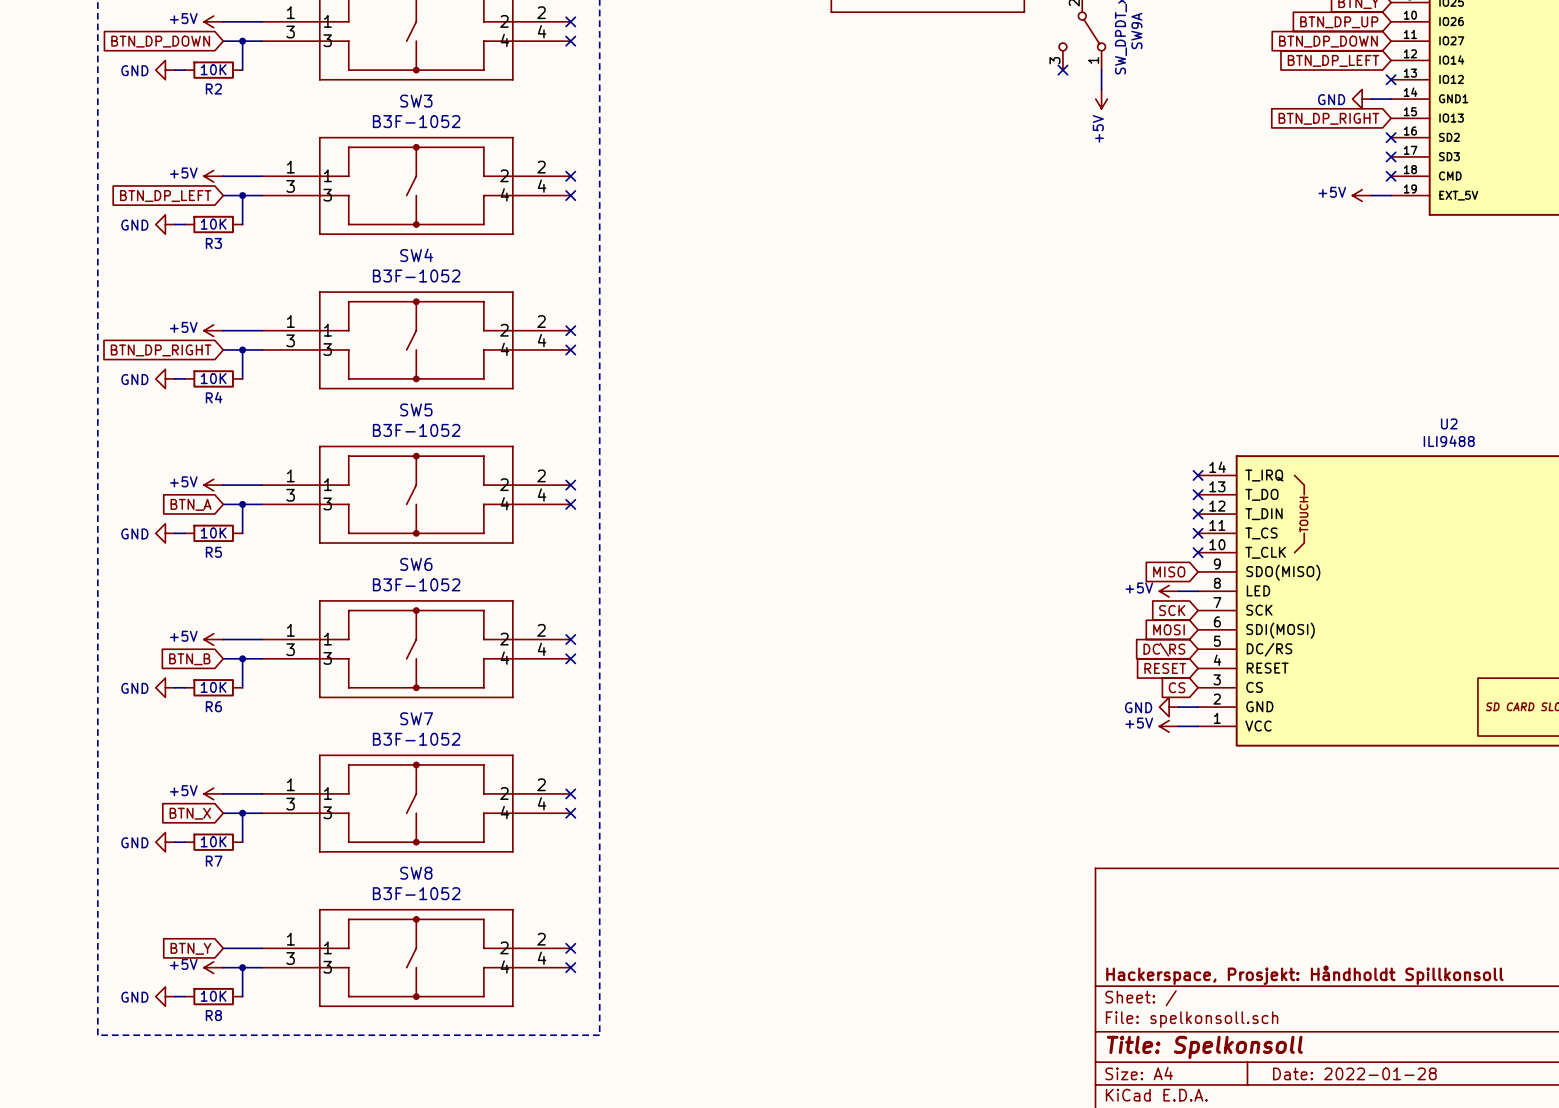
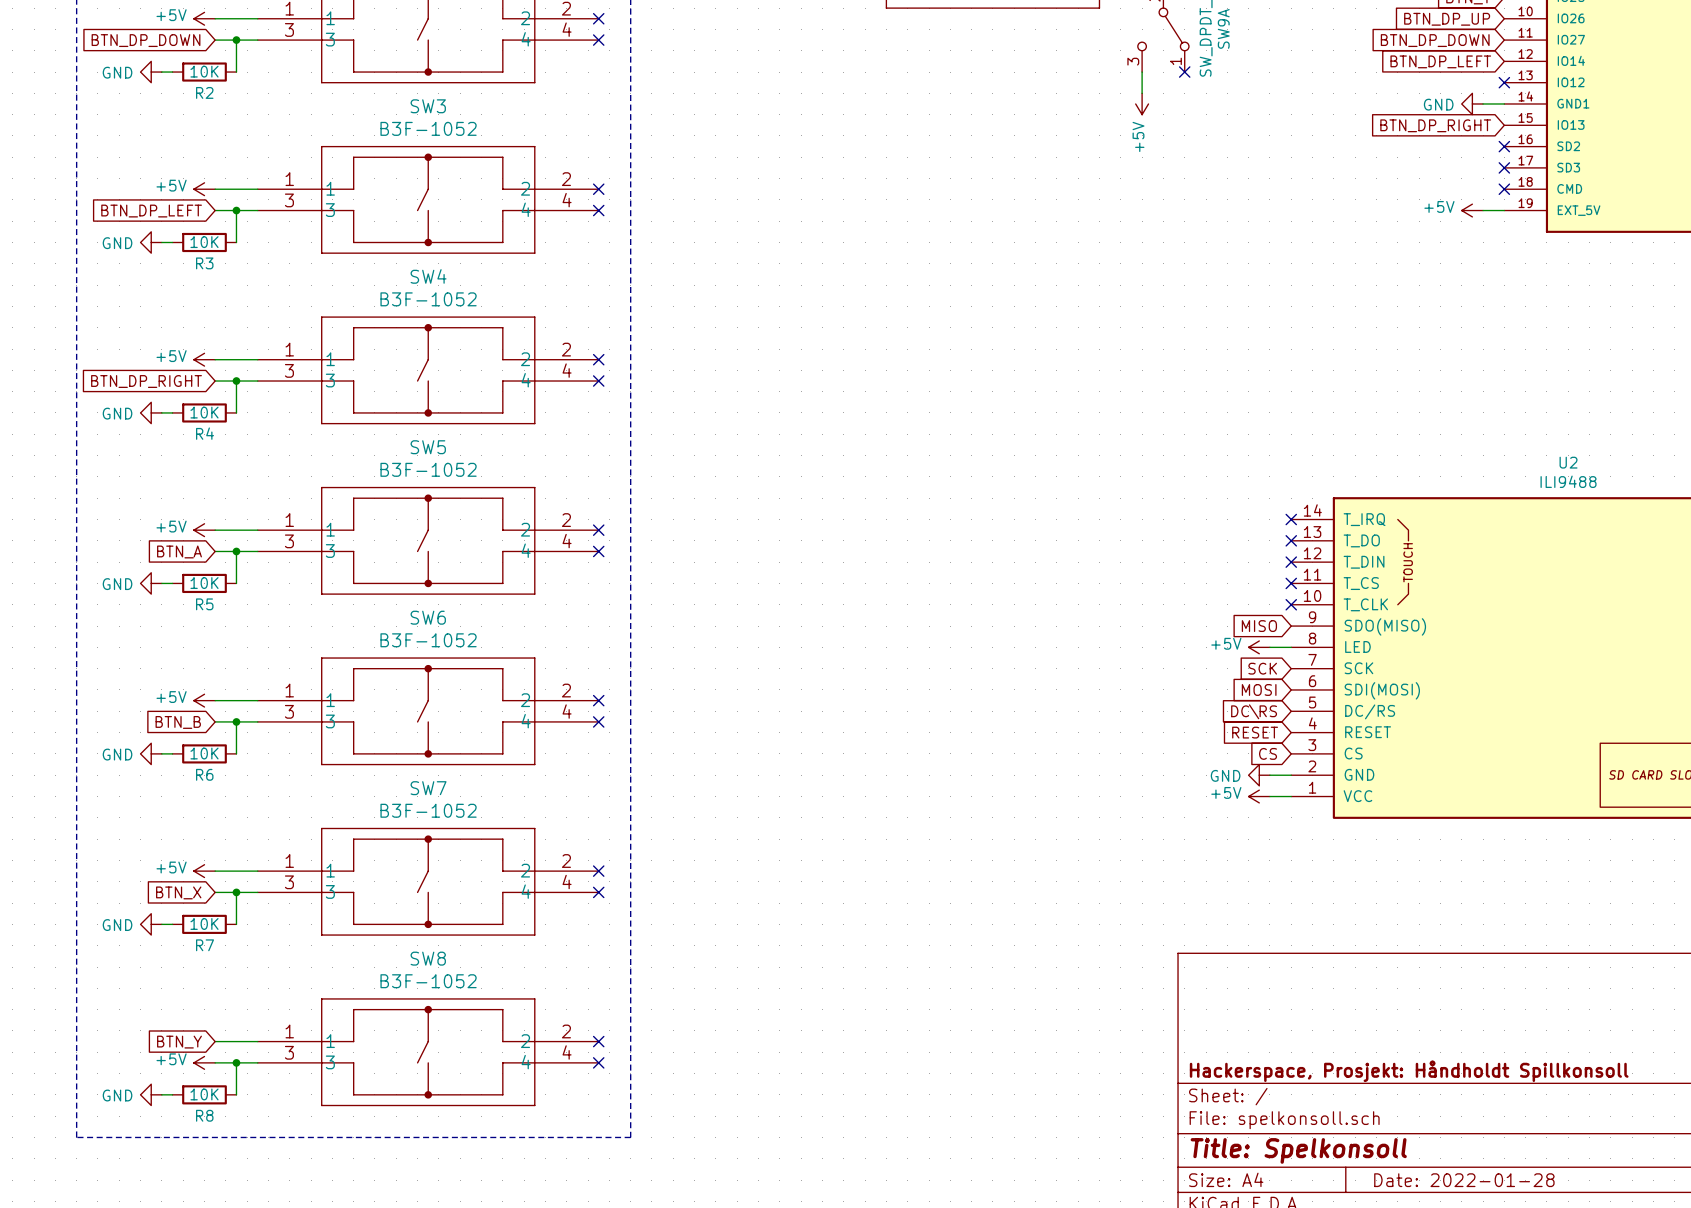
no-connect mark position: (1062, 70) -> (1184, 72)
wire: (1101, 70) (1101, 89) -> (1142, 72) (1142, 93)
power symbol position: +5V (1101, 99) -> +5V (1142, 103)

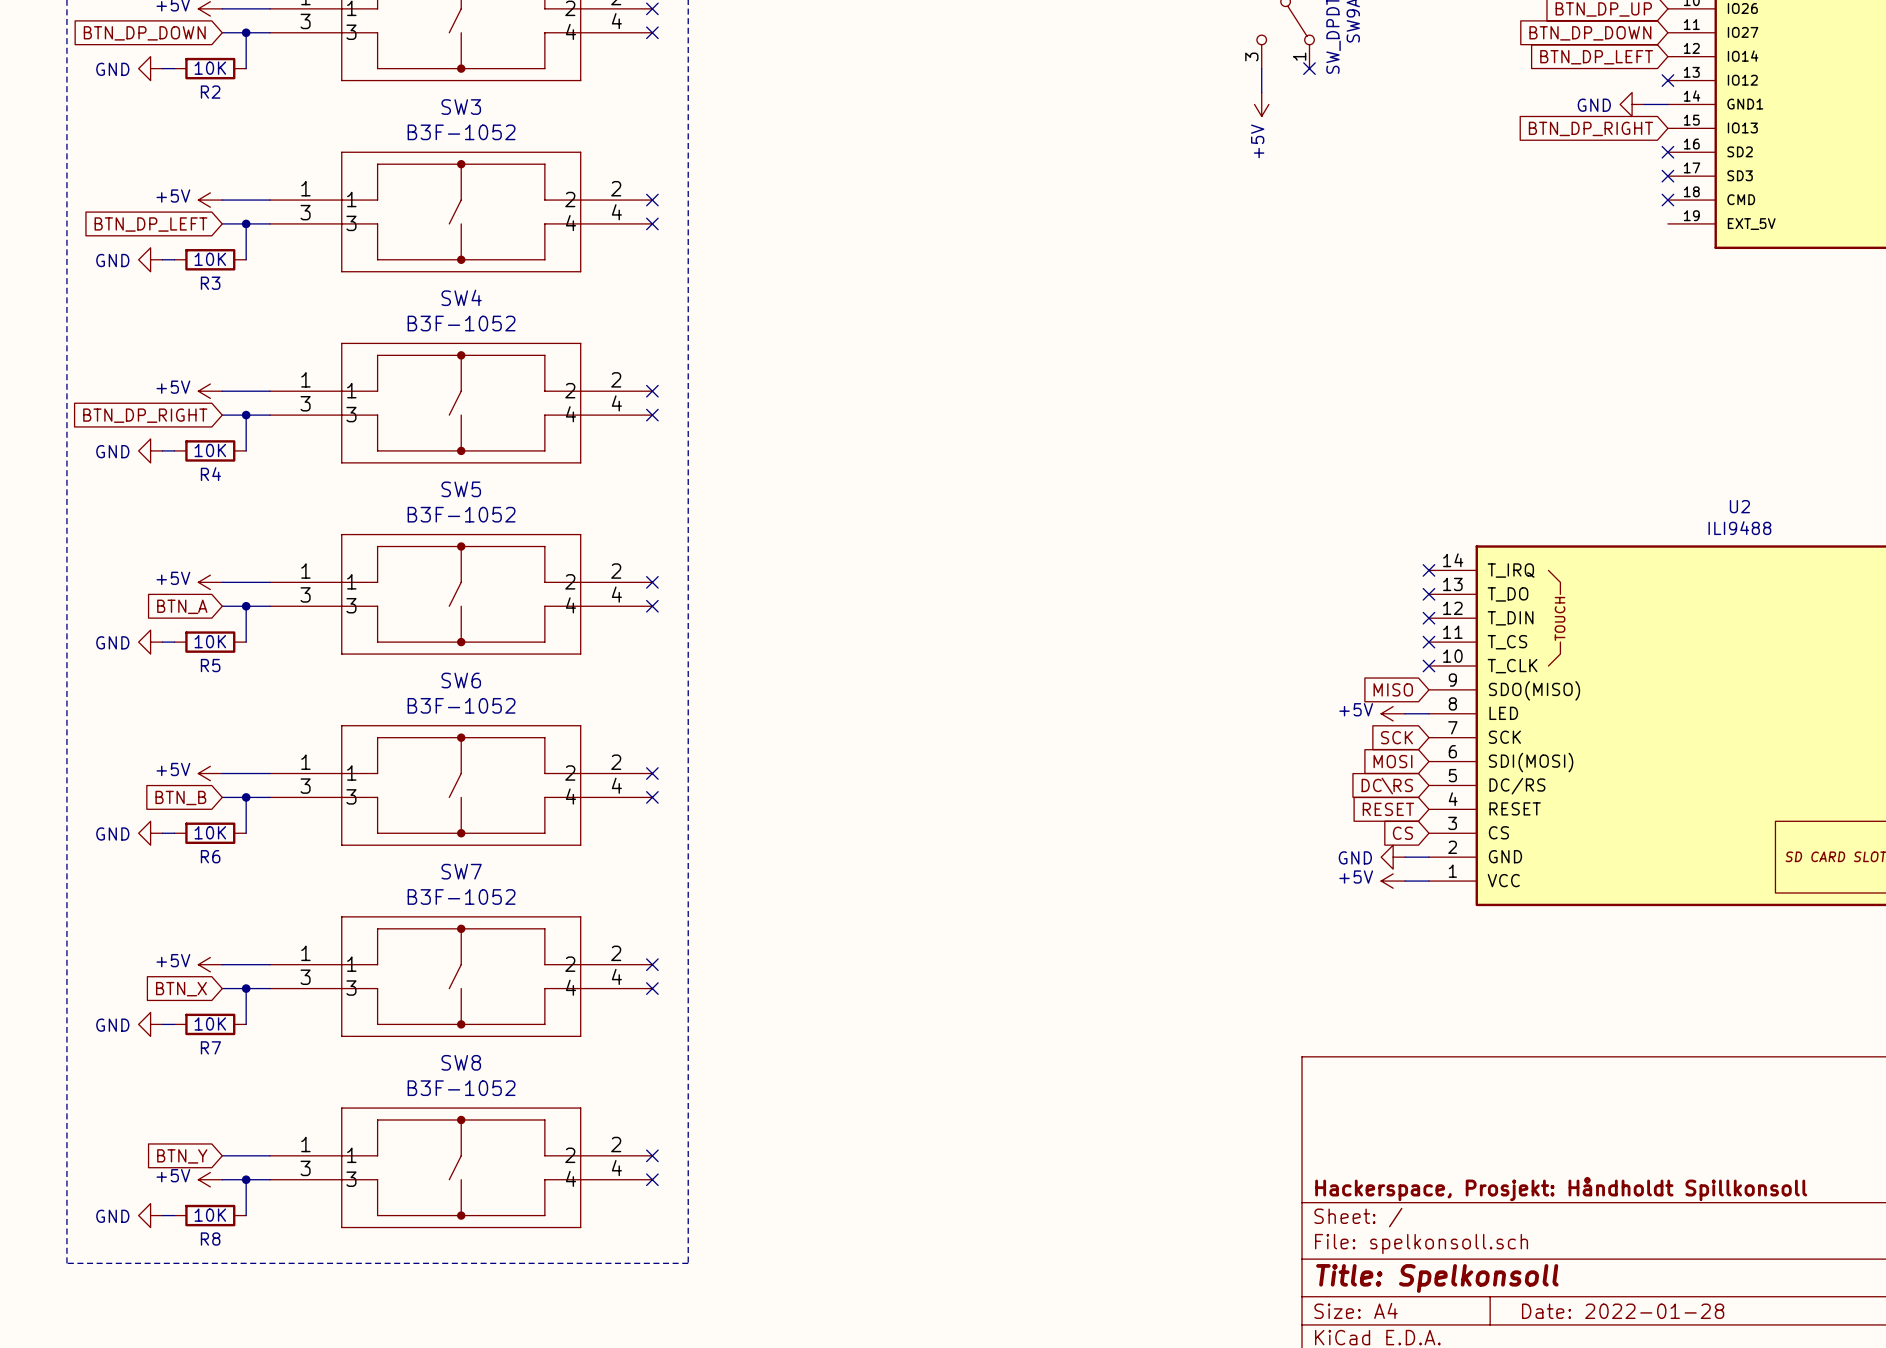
power symbol: +5V (1472, 210) -> none
wire: (1483, 210) (1504, 210) -> none

